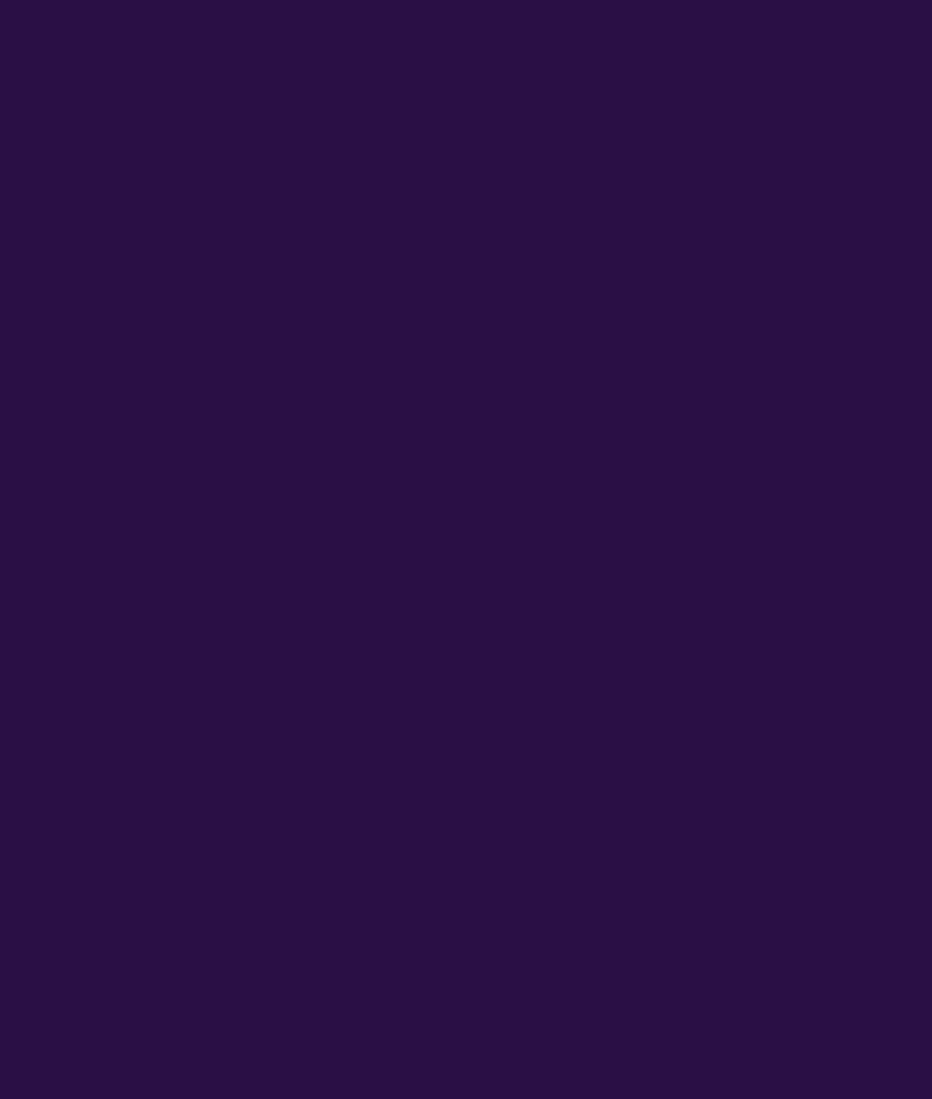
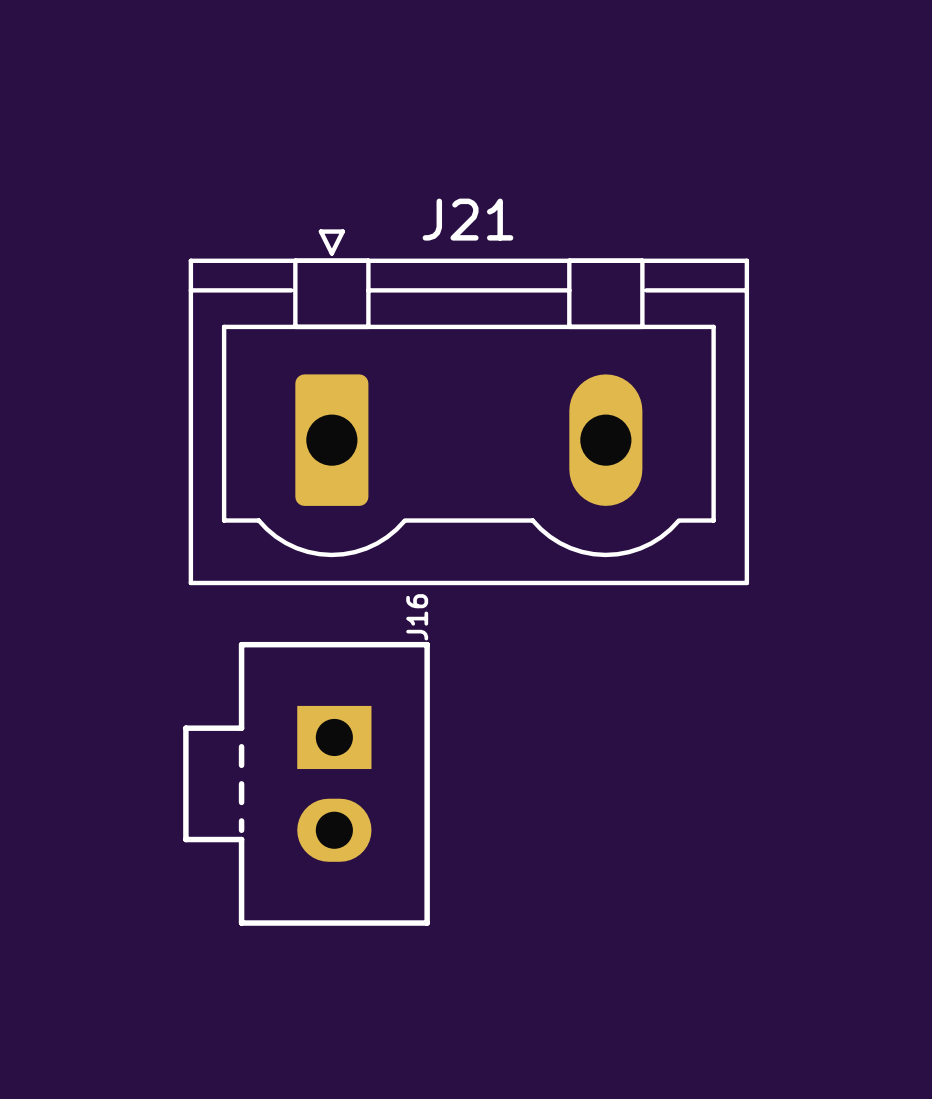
J21: none -> (468, 407)
J16: none -> (306, 783)

